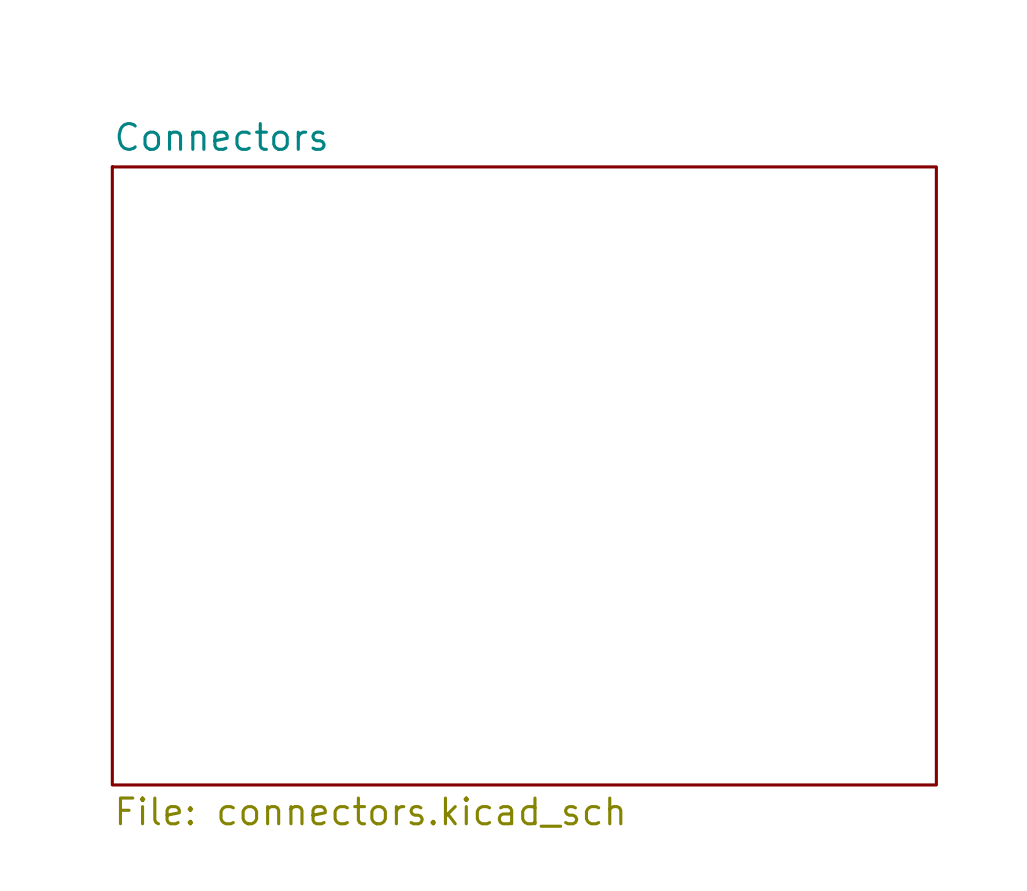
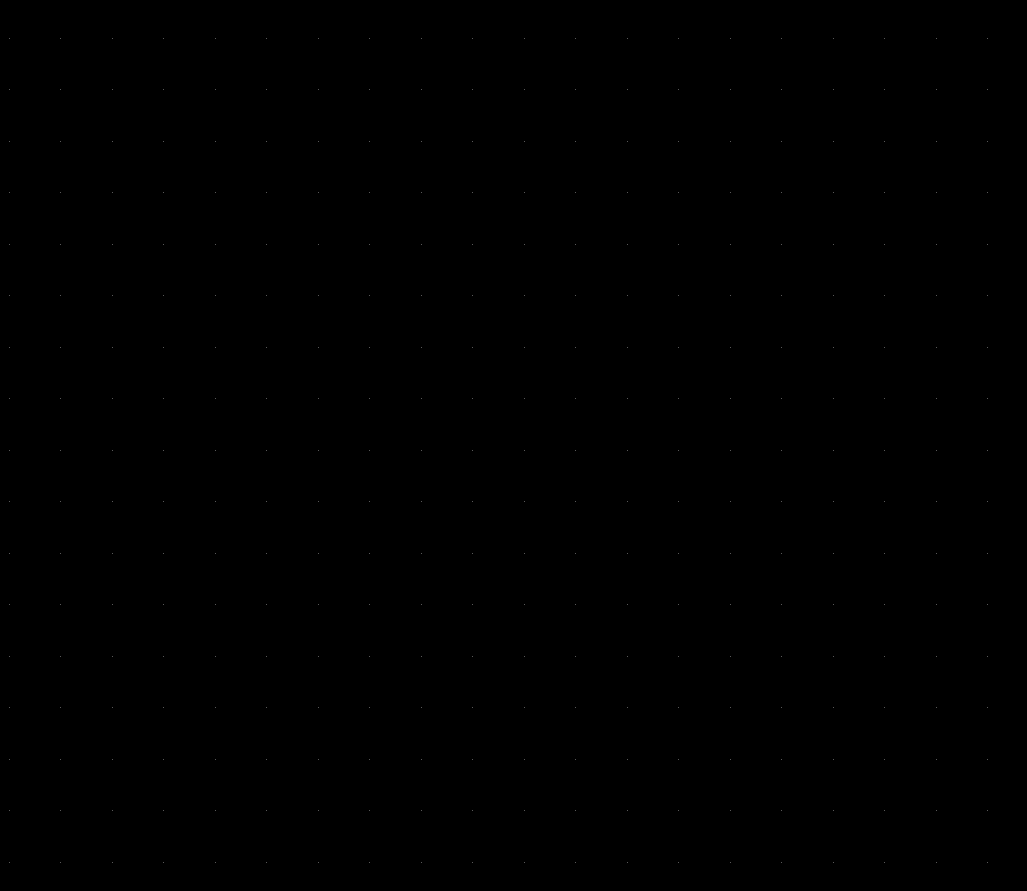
sheet Connectors: File: connectors.kicad_sch (524, 475) -> none

